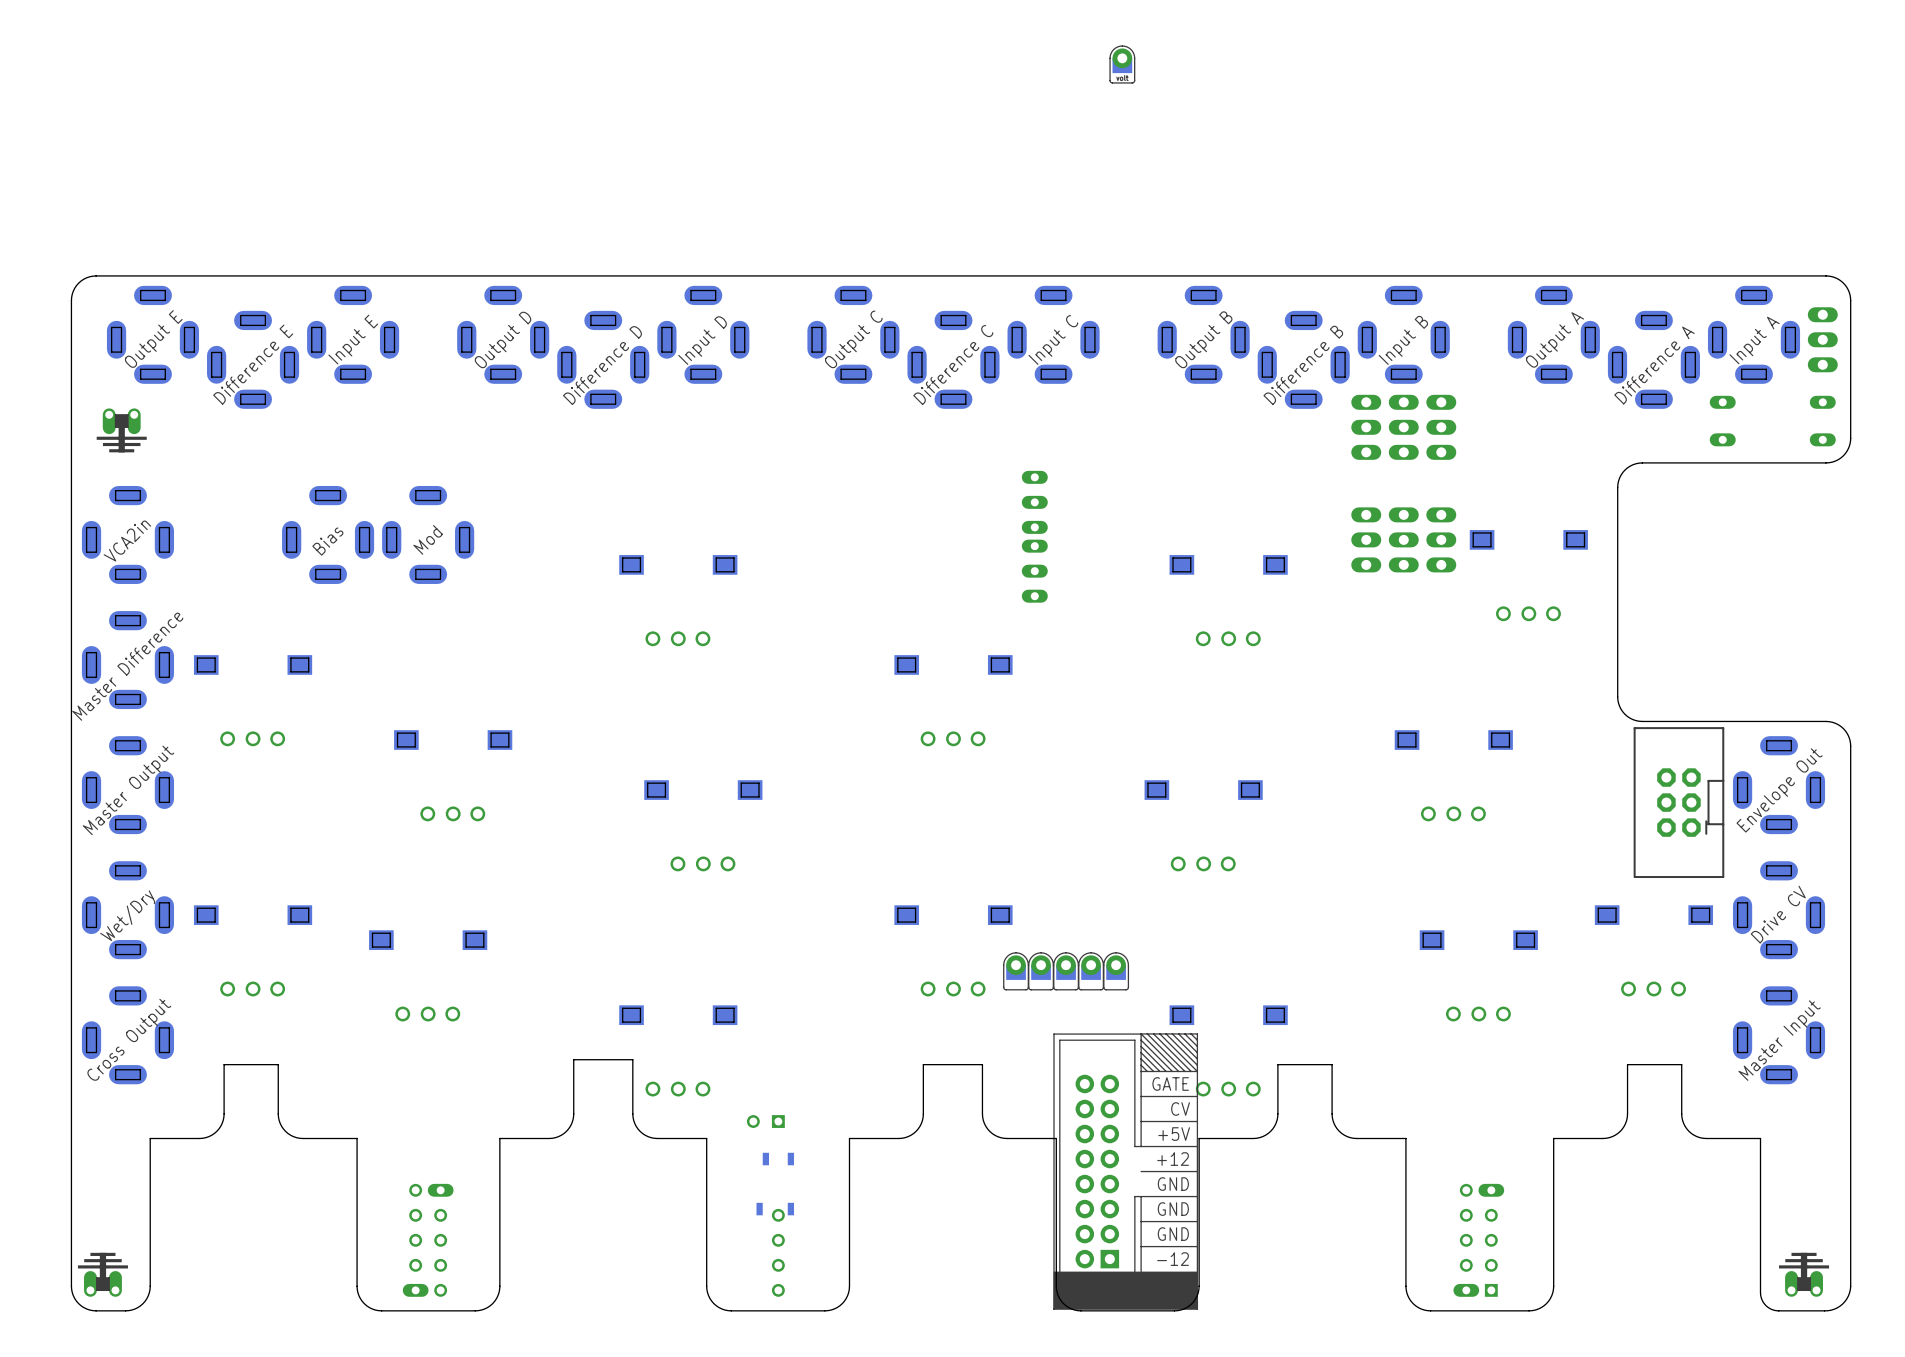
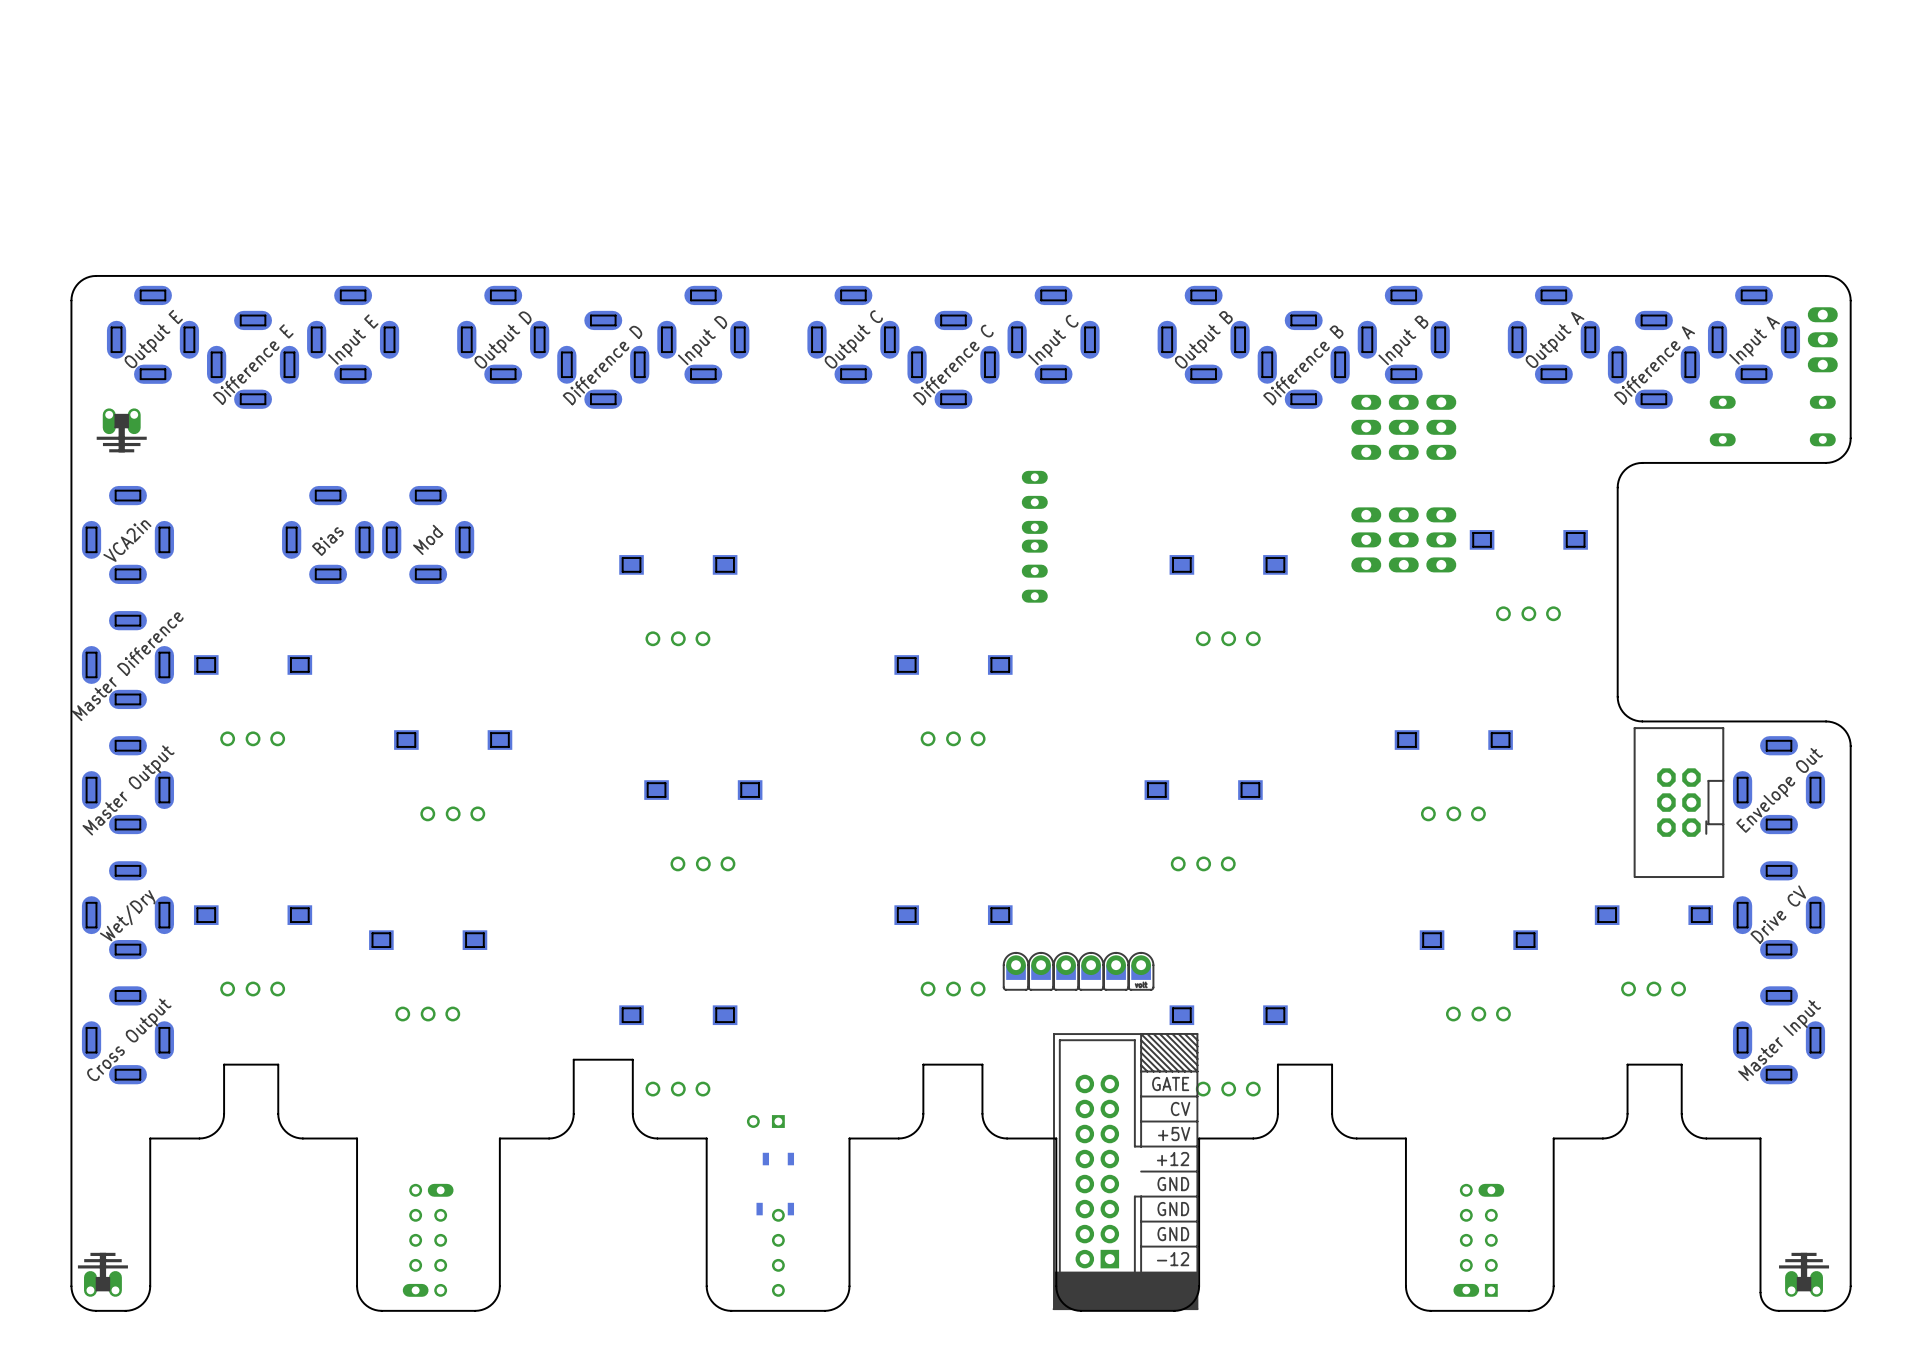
part: (1122, 64) -> none
part: none -> (1141, 971)

